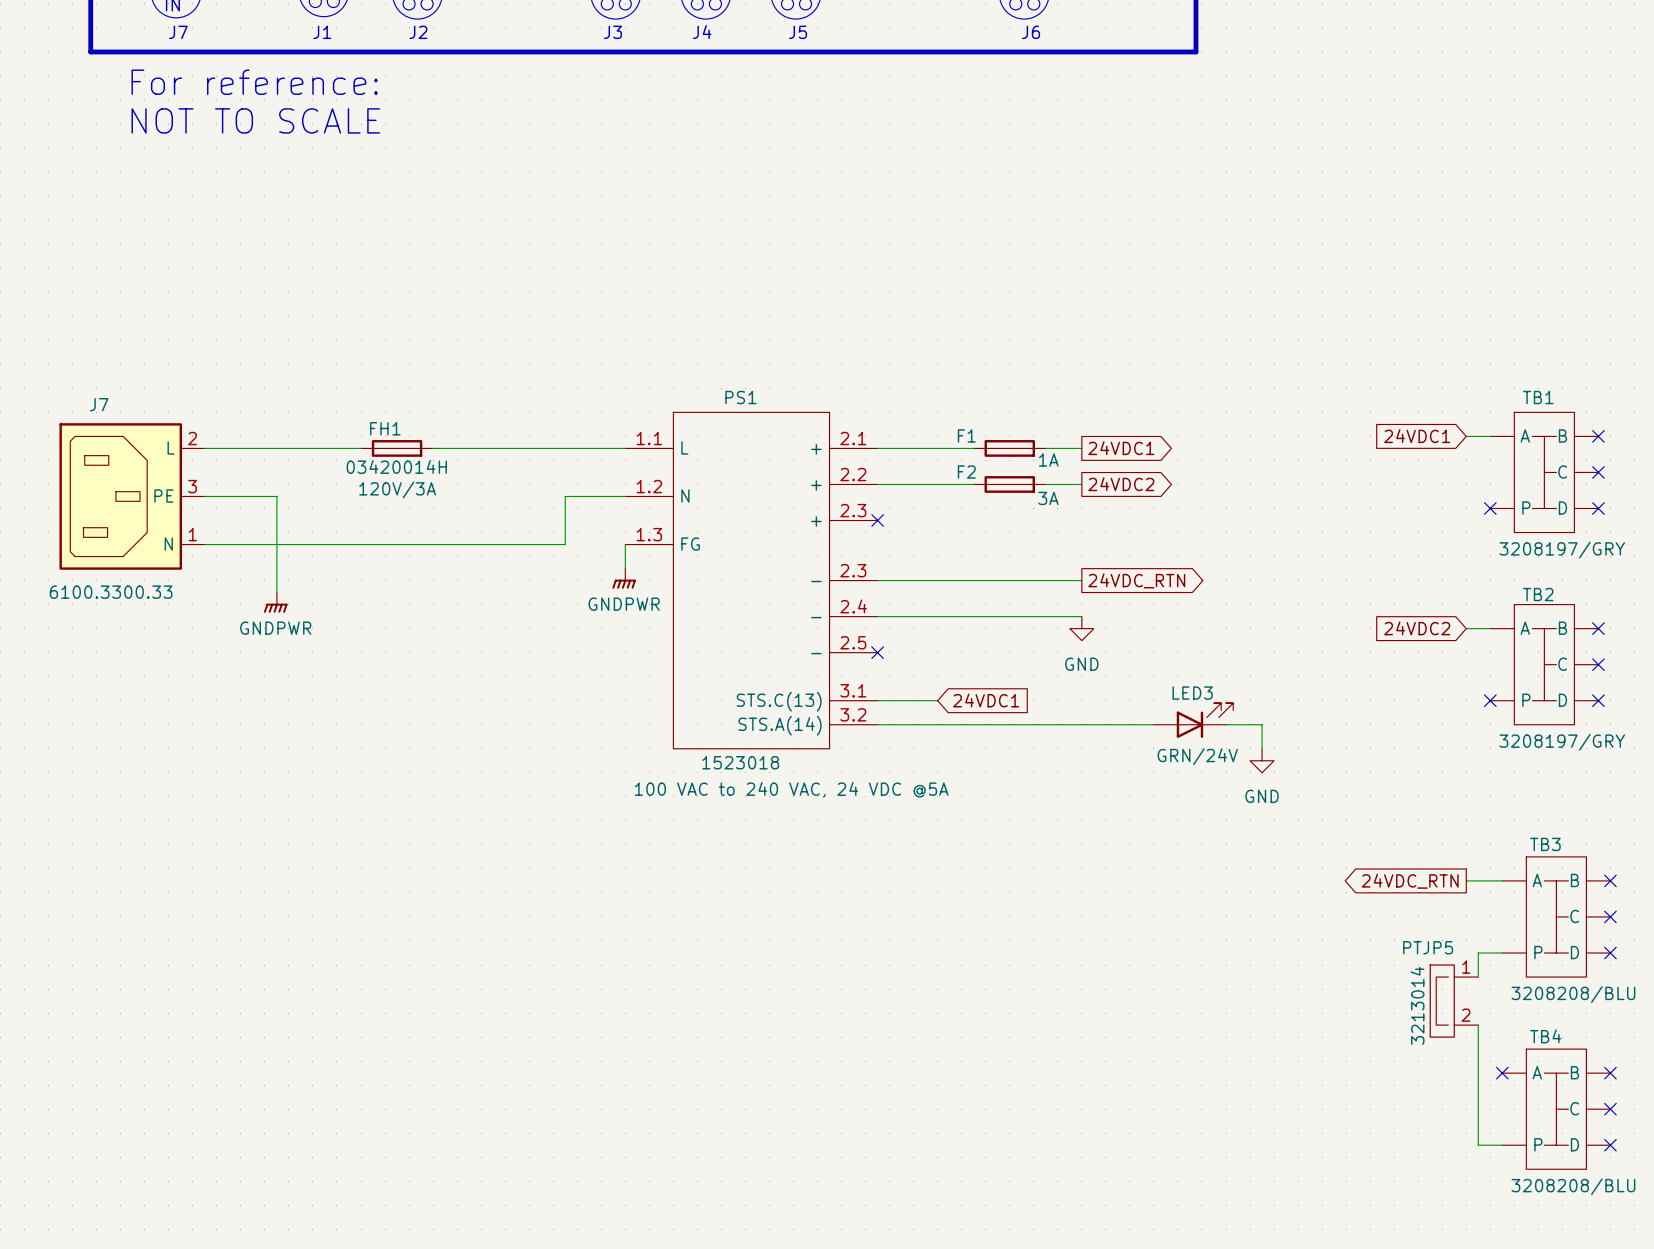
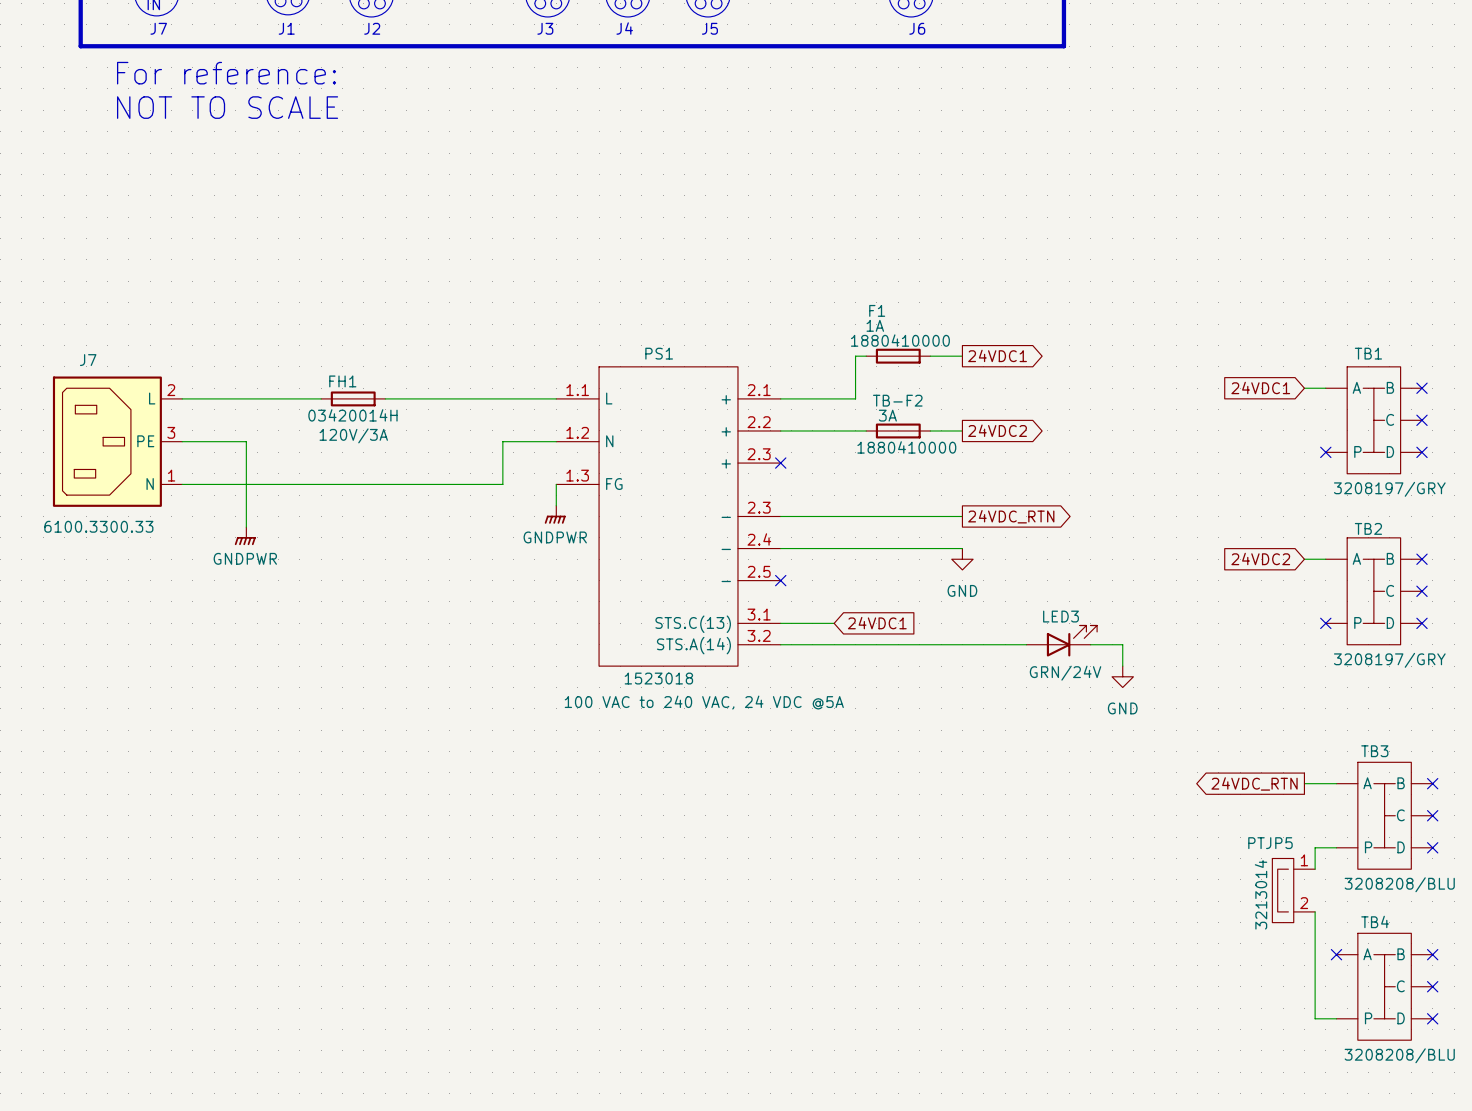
F1 text: none -> 1A (875, 325)
F1 name position: F1 (966, 435) -> F1 (877, 310)
wire: (961, 448) (973, 448) -> (855, 398) (855, 356) (866, 356)
F1 position: (1009, 448) -> (898, 356)
wire: (1045, 448) (1081, 448) -> (930, 356) (962, 356)
global label position: 24VDC1 (1121, 448) -> 24VDC1 (997, 355)
F1 value: 1A (1048, 459) -> 1880410000 (900, 340)
F2 text: none -> 3A (887, 415)
F2 name: F2 (966, 472) -> TB-F2 (897, 400)
F2 value: 3A (1048, 498) -> 1880410000 (906, 447)

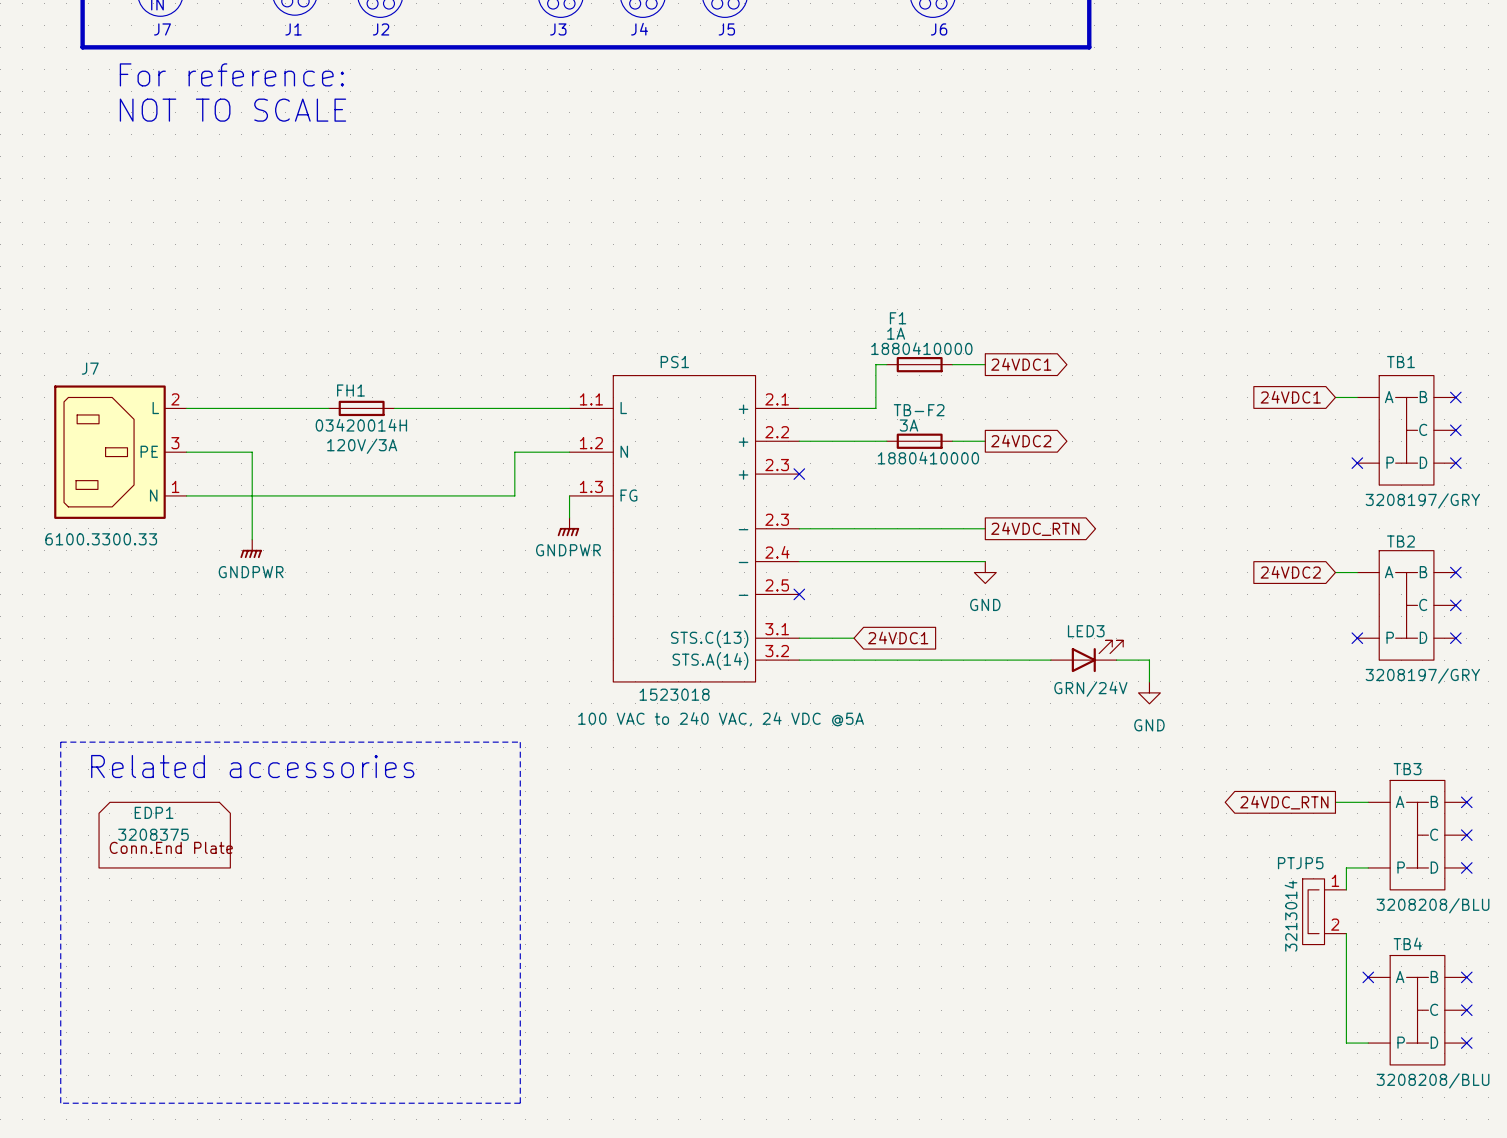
line: none -> (60, 742) (520, 742) (520, 1103) (60, 1103) (60, 742)
text: none -> Related accessories (252, 766)
EDP1: none -> 3208375 (164, 835)

